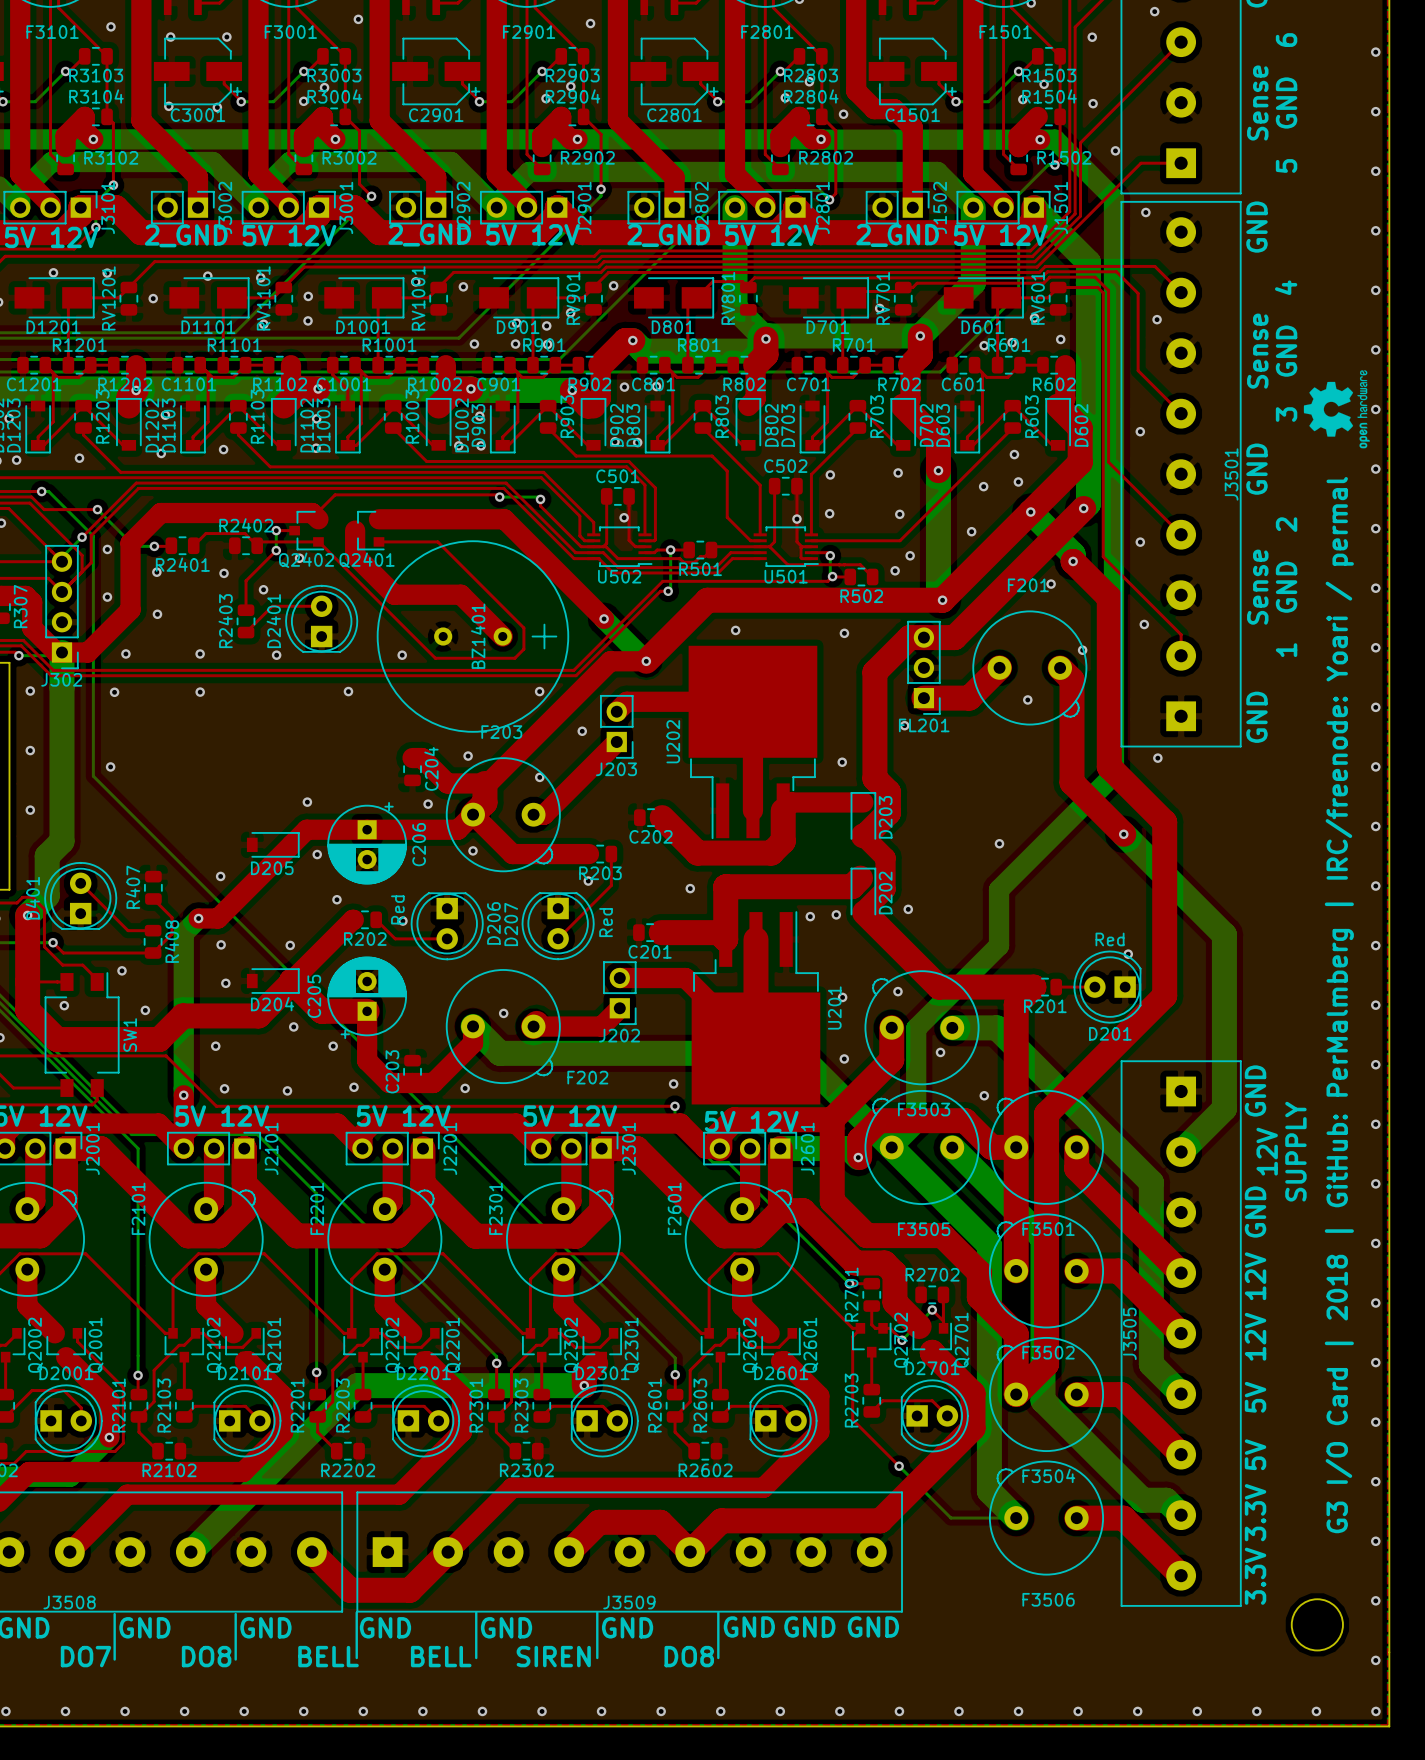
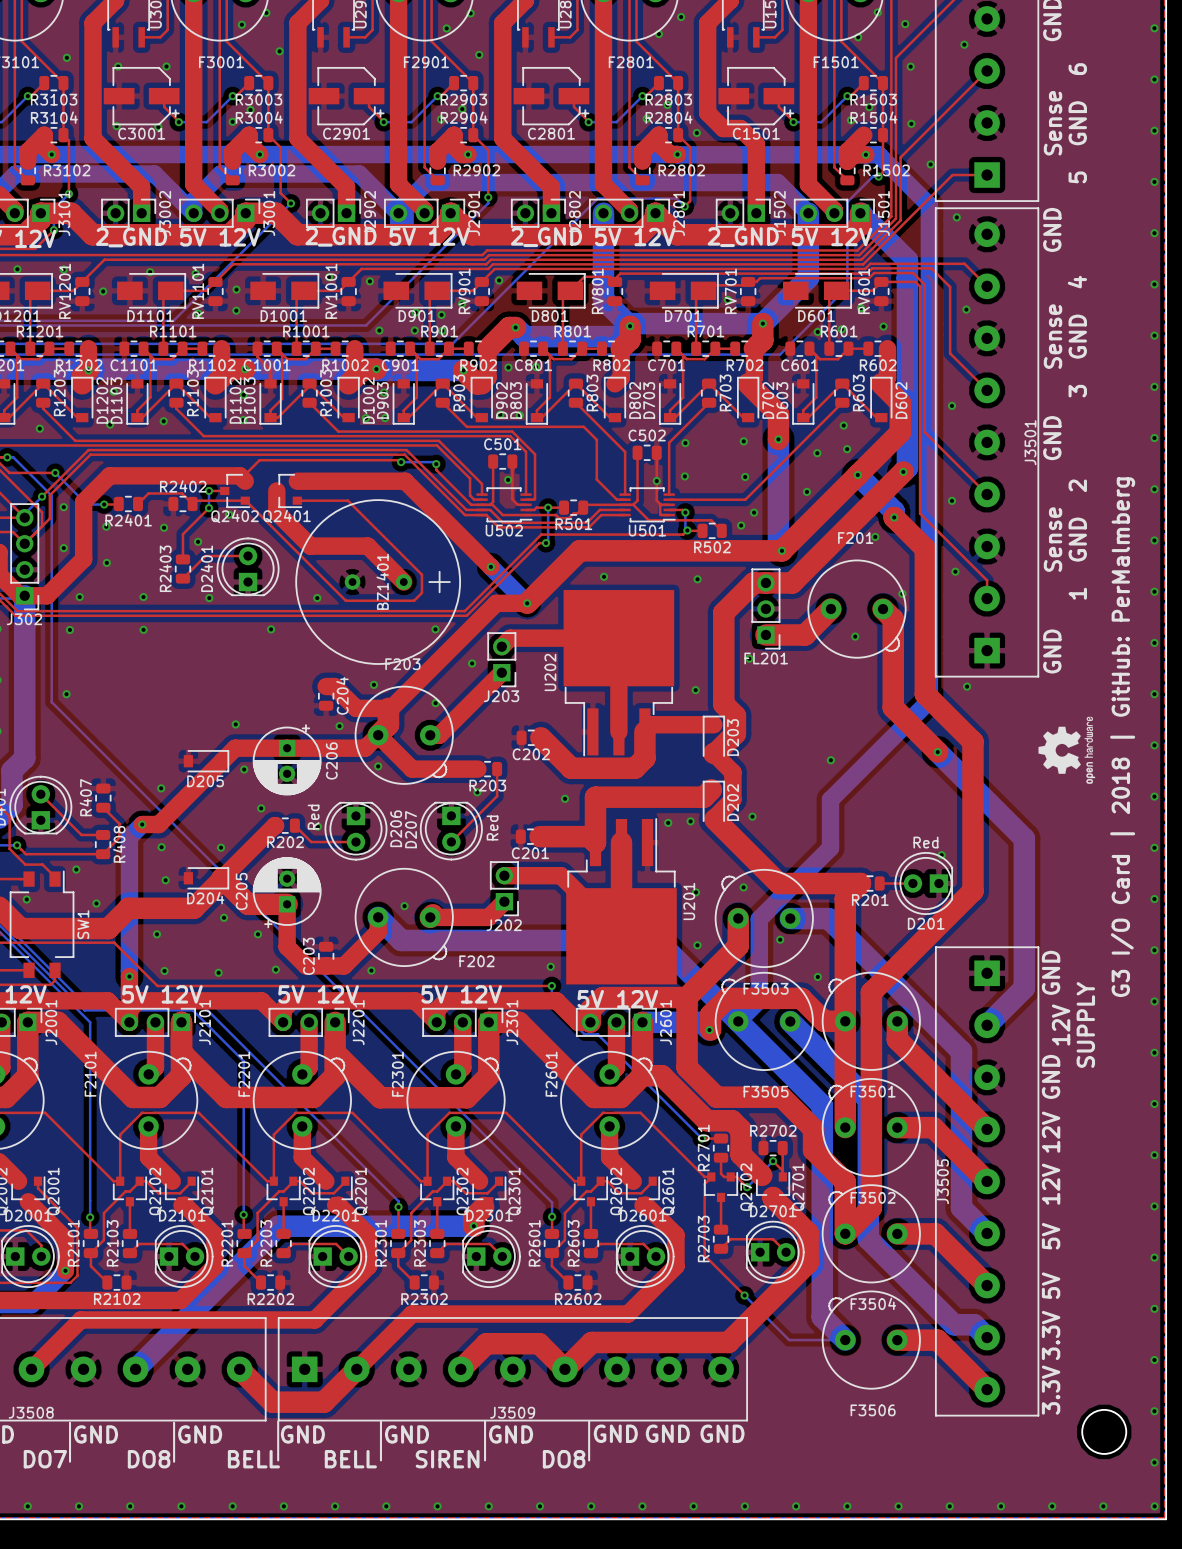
drawing: [1303, 370, 1370, 449] -> none
drawing: none -> [1038, 716, 1096, 784]
text: G3 I/O Card | 2018 | GitHub: PerMalmberg | IRC/freenode: Yoari / permal (1339, 1005) -> G3 I/O Card | 2018 | GitHub: PerMalmberg (1122, 737)

